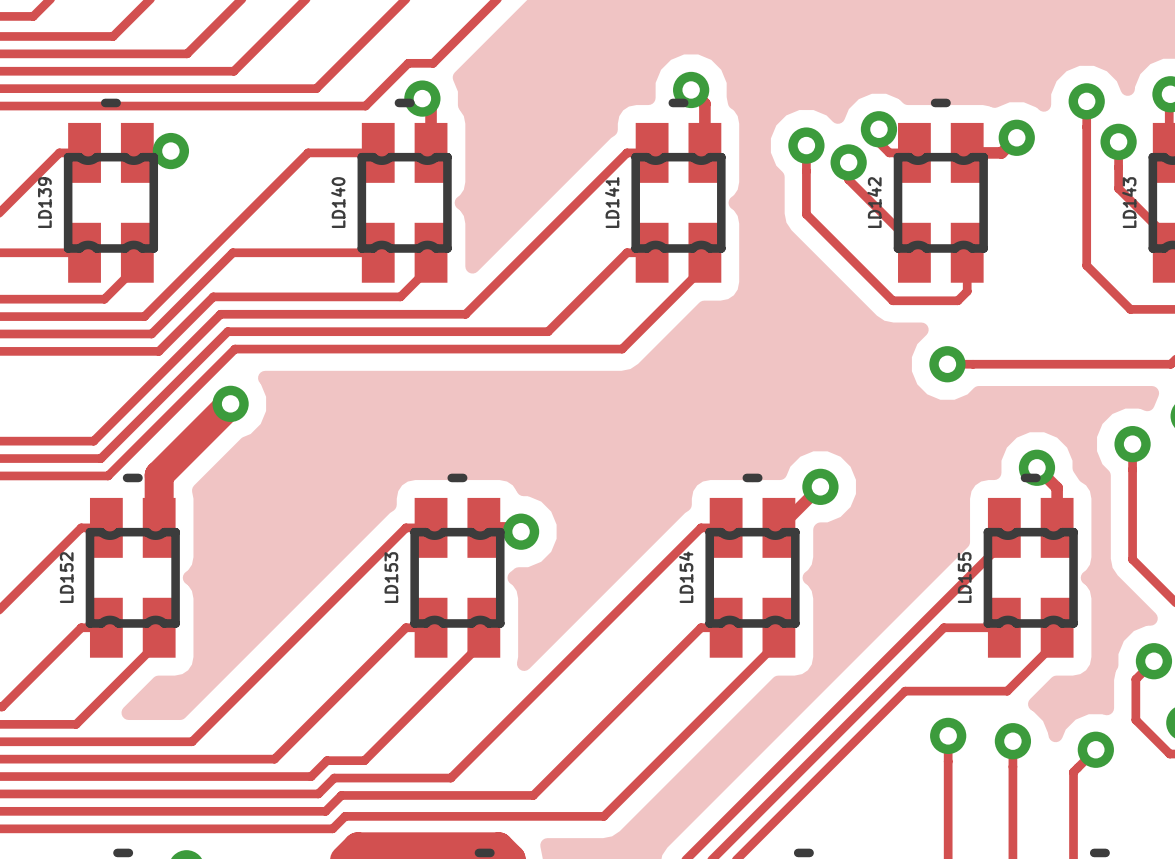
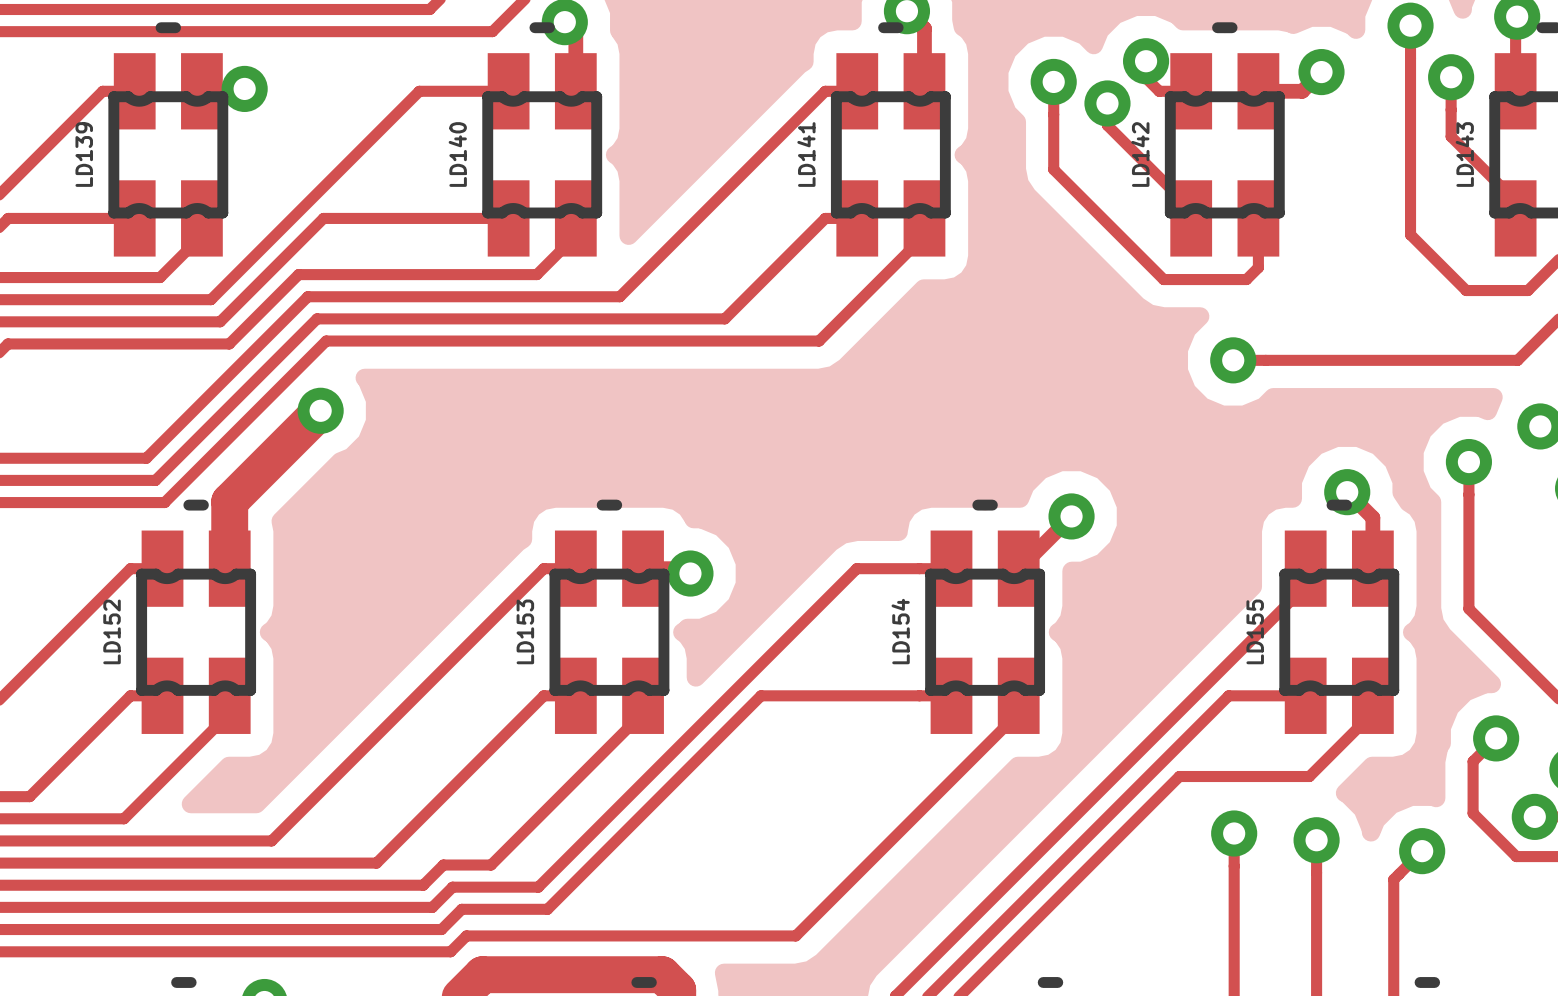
track: (701, 527) (450, 778) (401, 778) -> (919, 568) (856, 568) (538, 887)
track: (701, 627) (533, 795) (408, 795) -> (919, 695) (761, 695) (547, 909)

